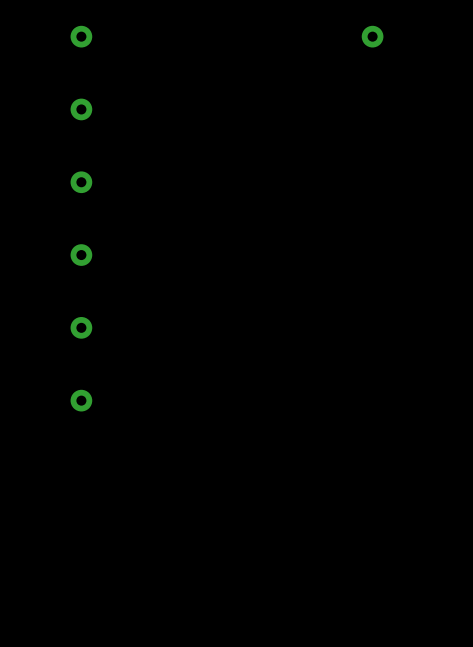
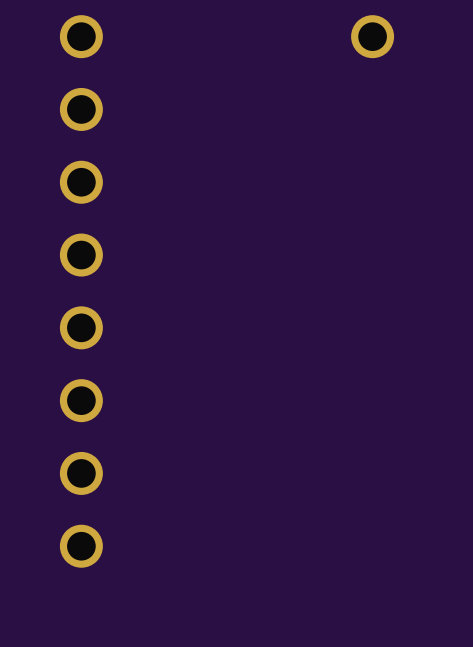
via size: [70, 25, 93, 48] -> [59, 15, 103, 59]
via size: [361, 25, 384, 48] -> [351, 15, 395, 59]
via size: [70, 98, 93, 121] -> [59, 87, 103, 131]
via size: [70, 171, 93, 194] -> [59, 160, 103, 204]
via size: [70, 244, 93, 266] -> [59, 233, 103, 277]
via size: [70, 317, 93, 339] -> [59, 306, 103, 350]
via size: [70, 389, 93, 412] -> [59, 379, 103, 423]
via: none -> (81, 473)
via: none -> (81, 546)

